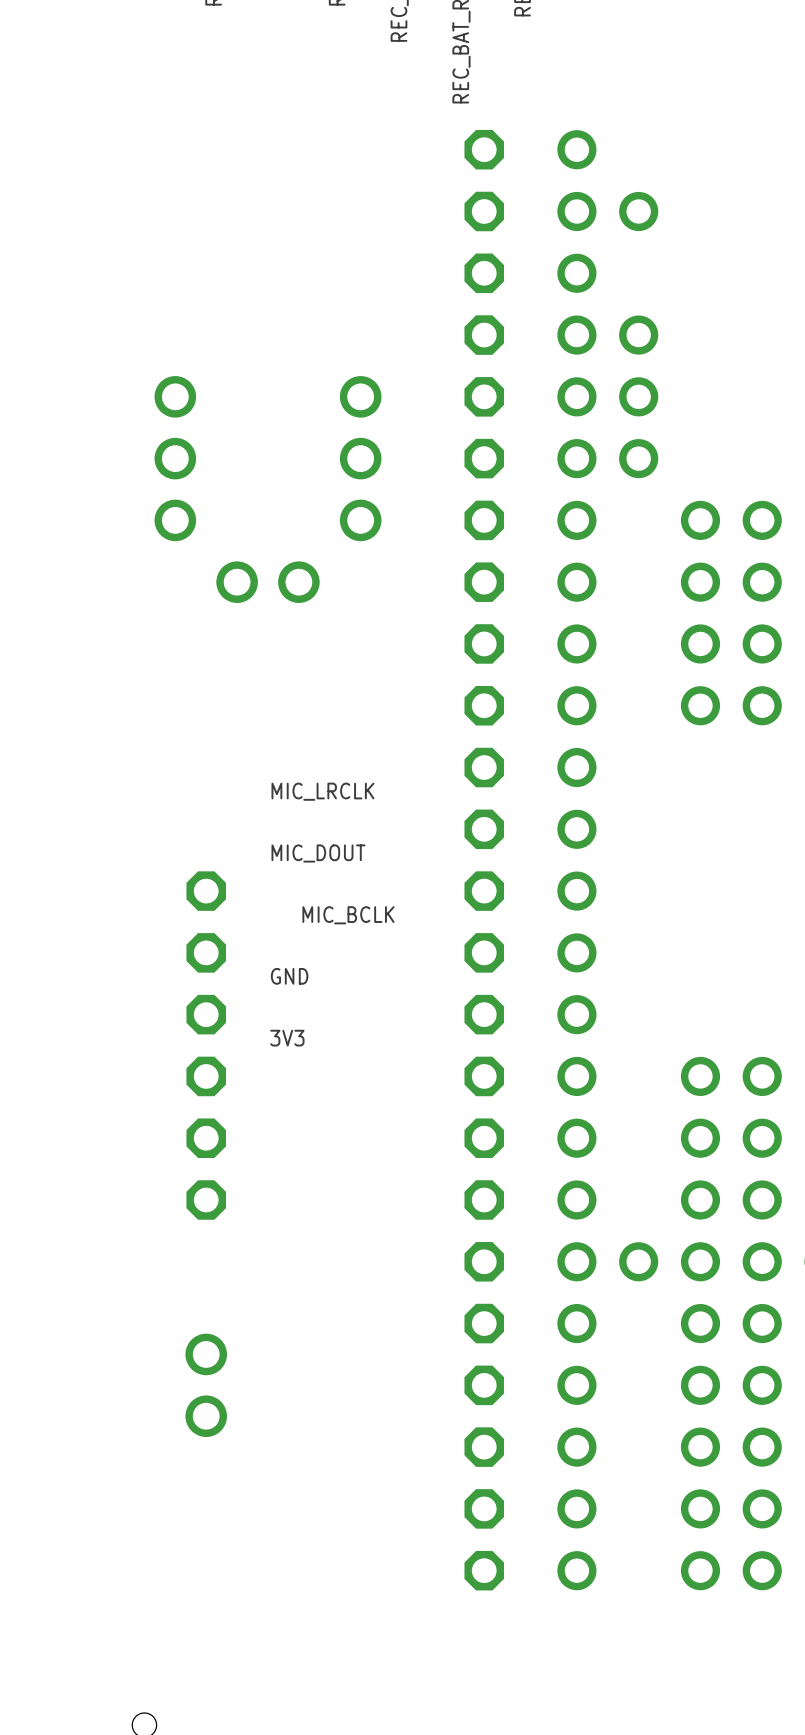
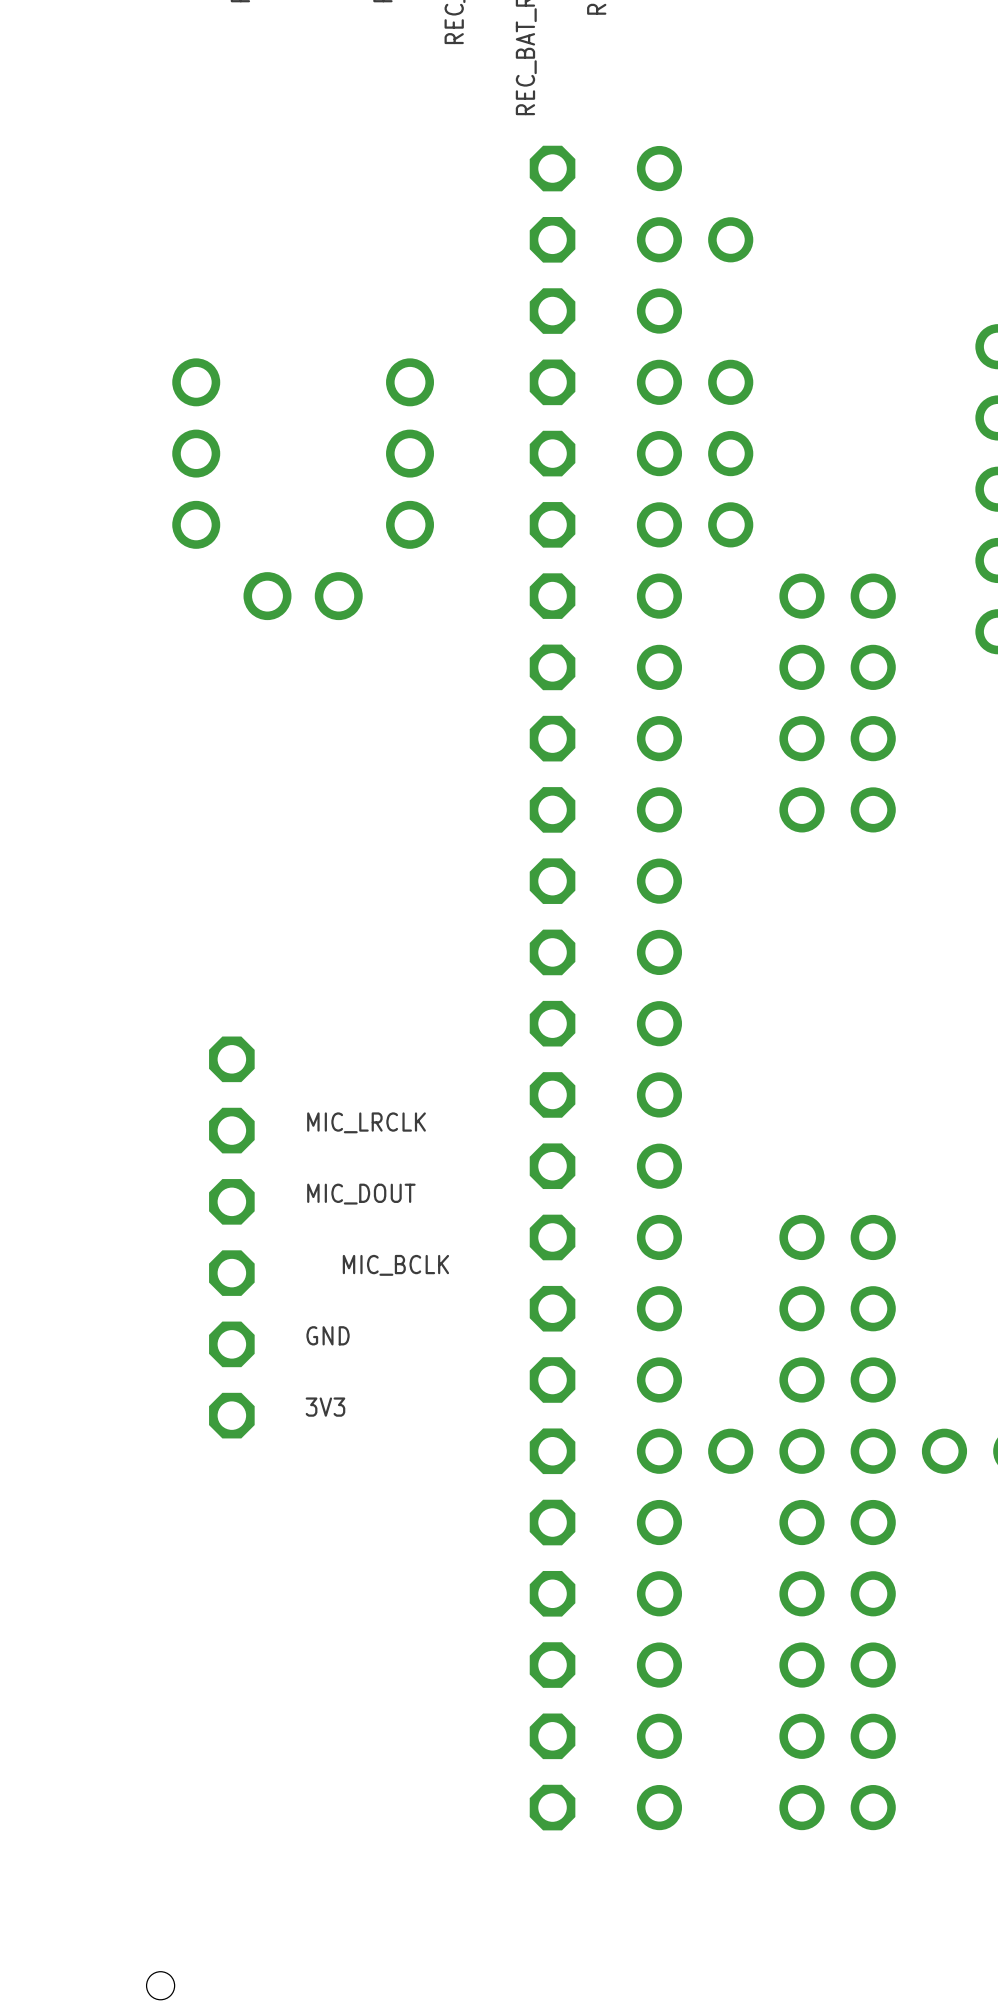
part position: (175, 458) -> (196, 453)
part position: (360, 458) -> (410, 453)
part position: (268, 582) -> (303, 596)
text: MIC_LRCLK (322, 791) -> none
text: MIC_DOUT (318, 853) -> none
text position: MIC_BCLK (348, 915) -> MIC_BCLK (395, 1265)
text: GND (289, 976) -> MIC_LRCLK (366, 1122)
text: 3V3 (287, 1038) -> MIC_DOUT (361, 1194)
part position: (206, 1045) -> (231, 1237)
text: none -> GND (328, 1335)
text: none -> 3V3 (325, 1407)
part: (206, 1385) -> none

